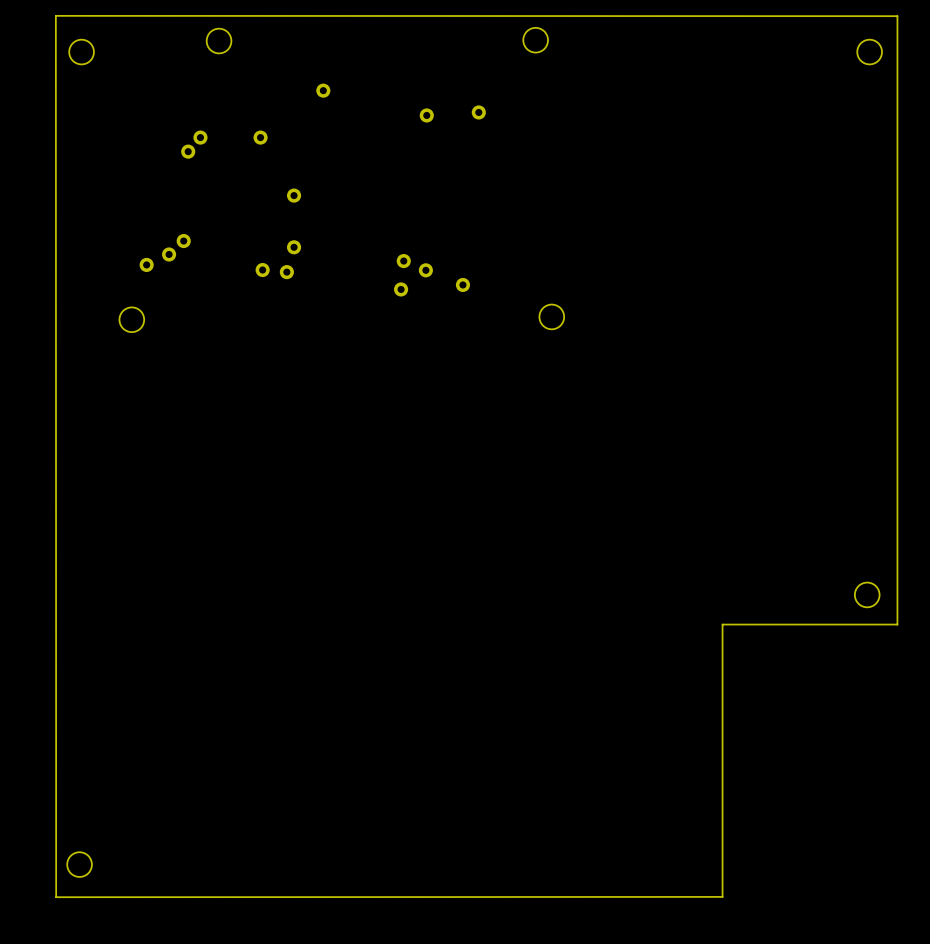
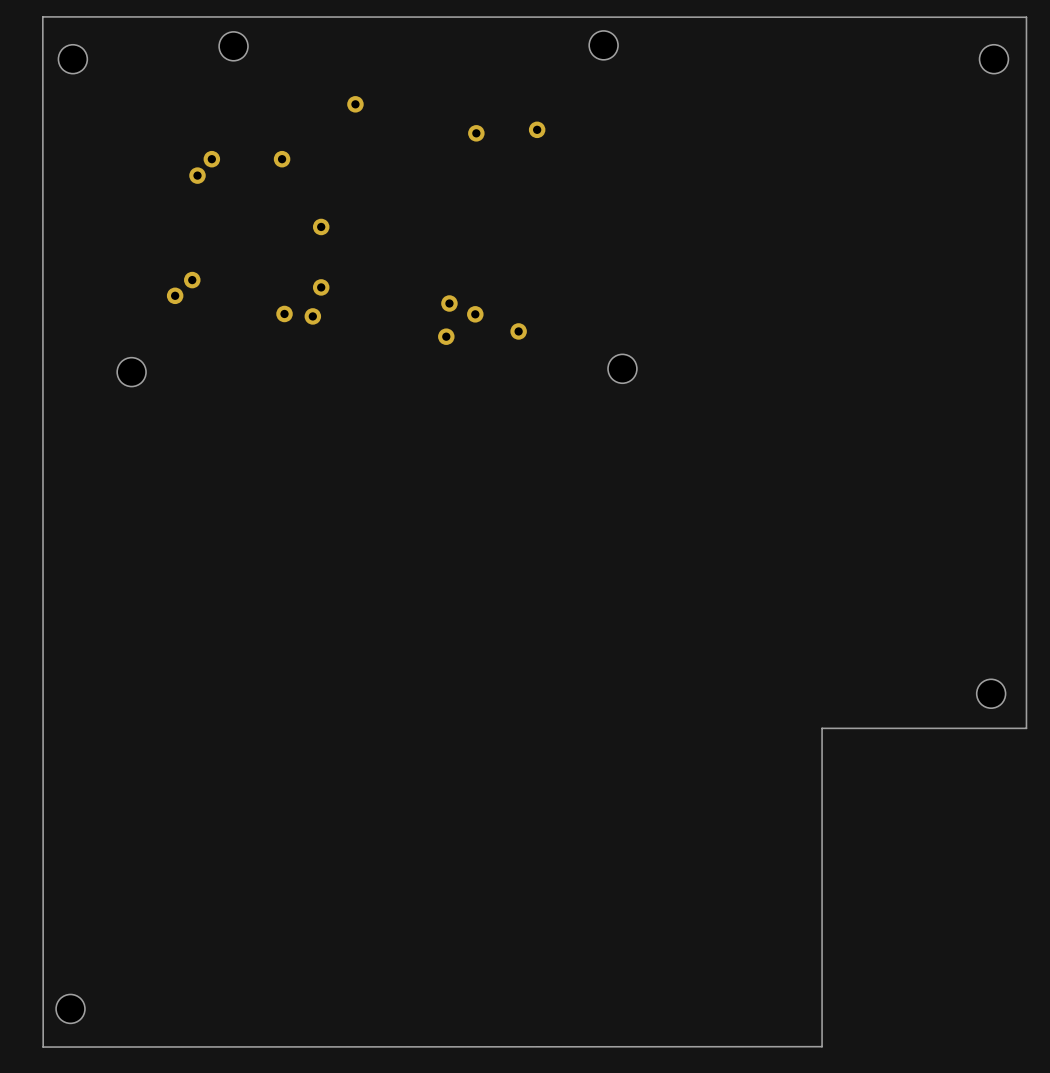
part: (146, 264) -> none

